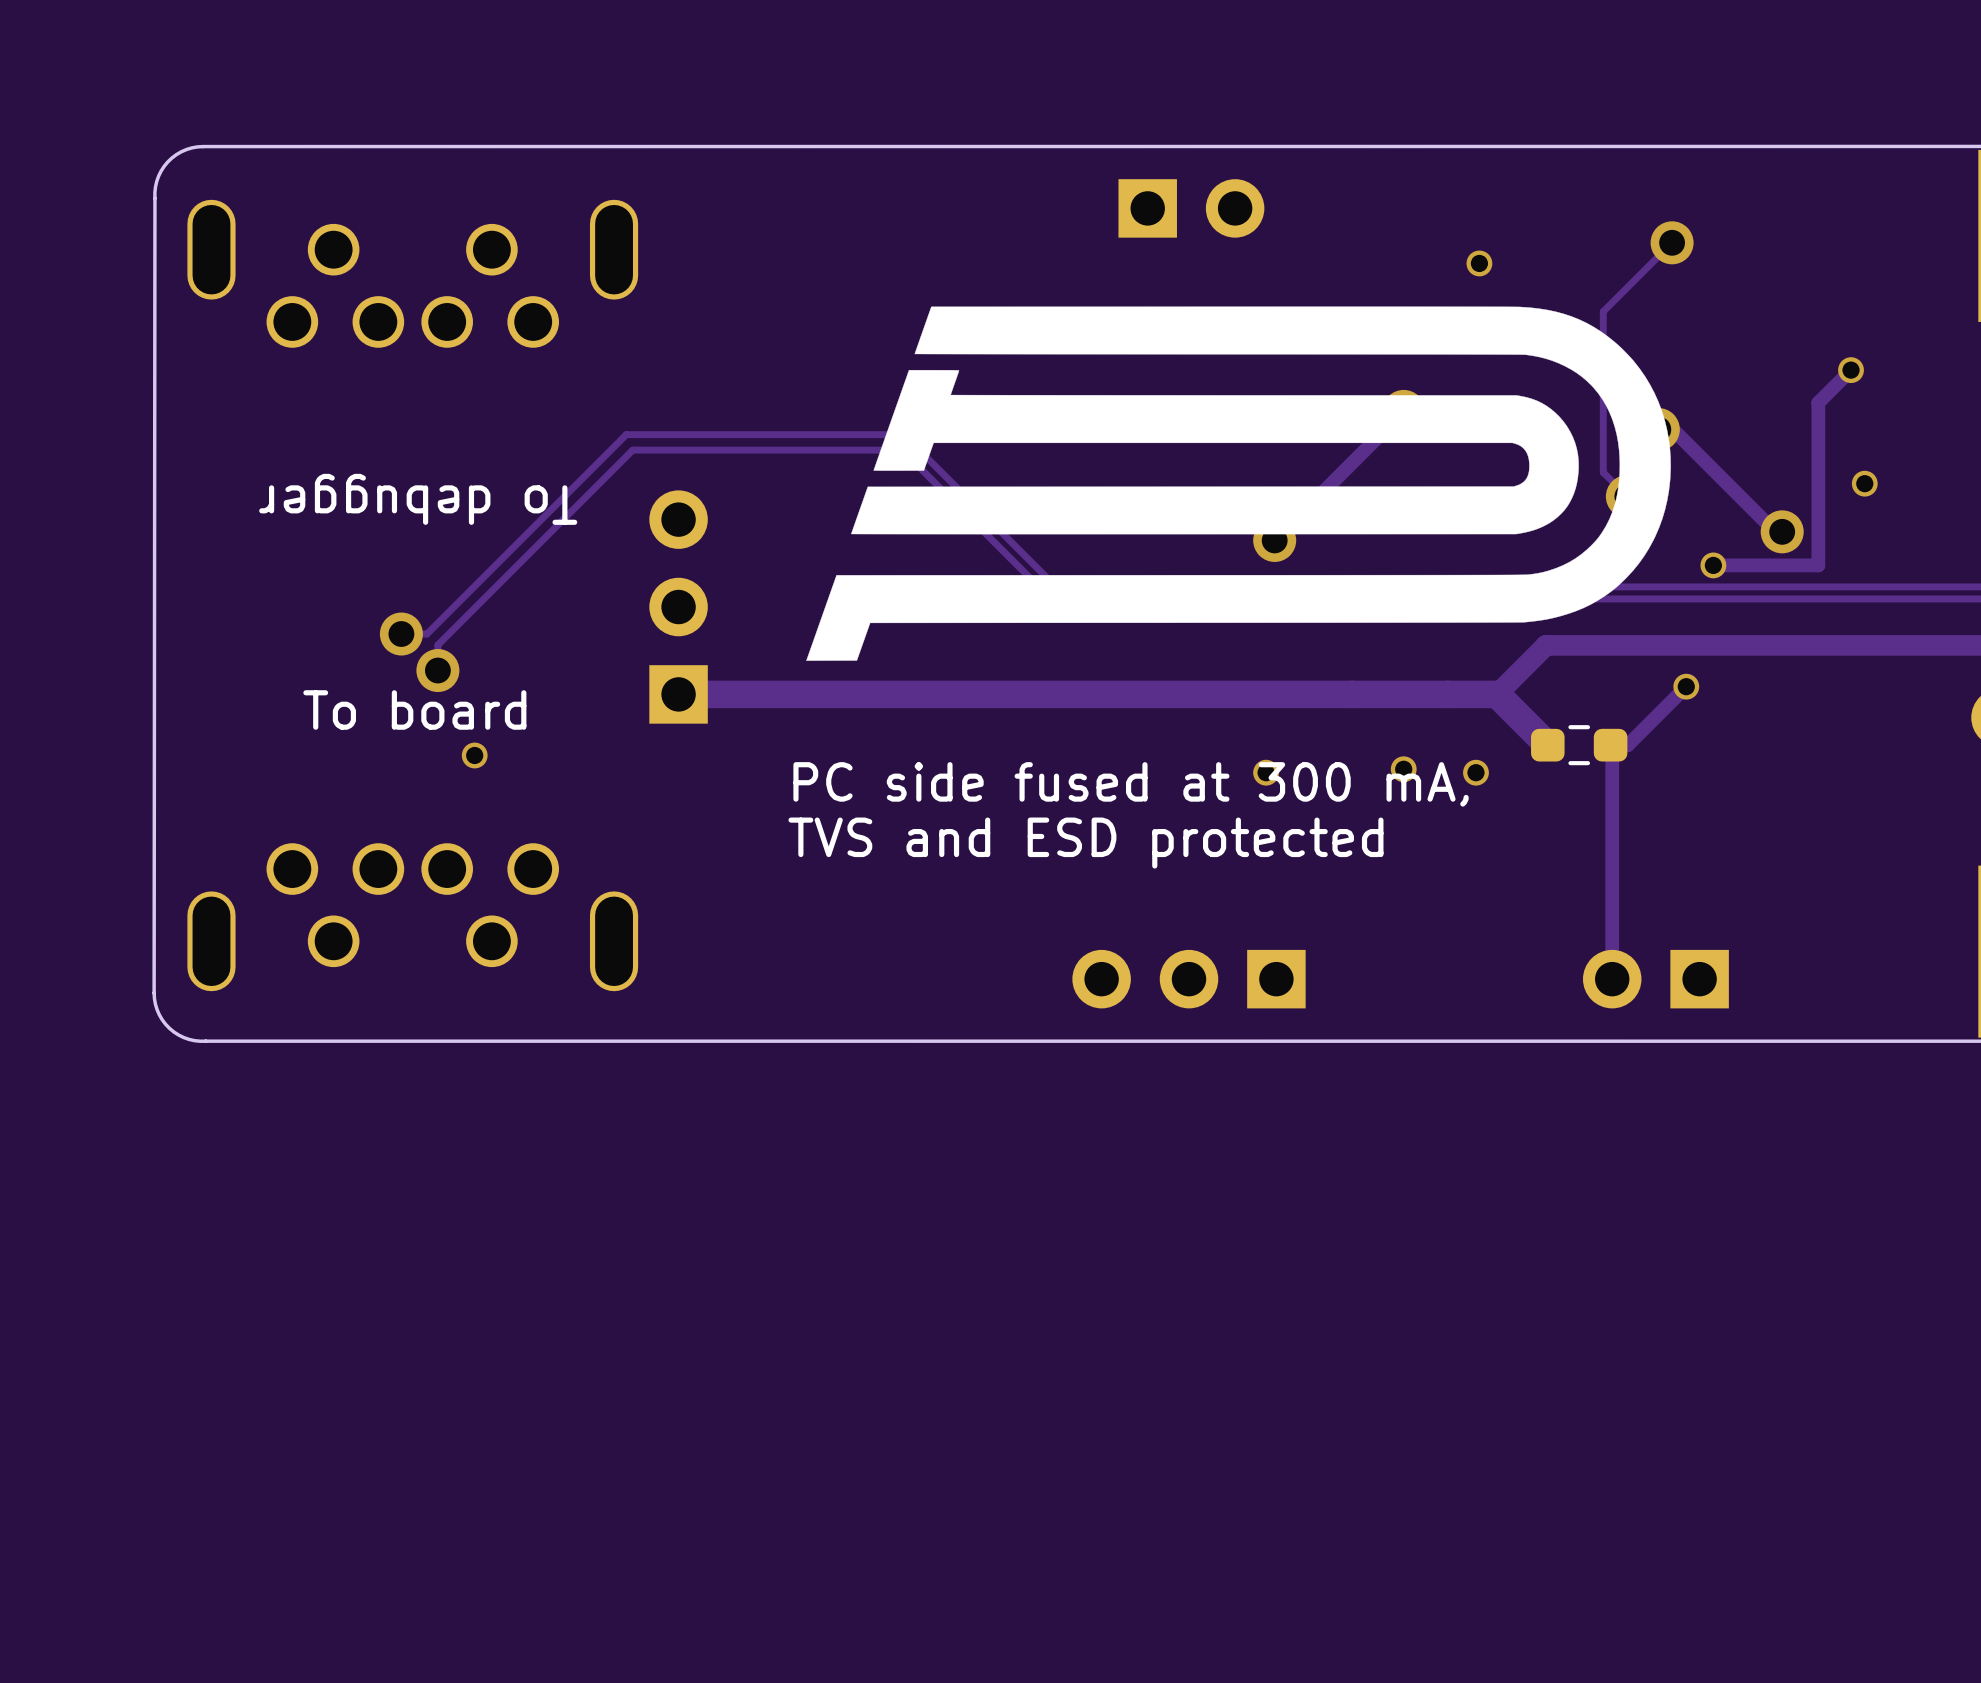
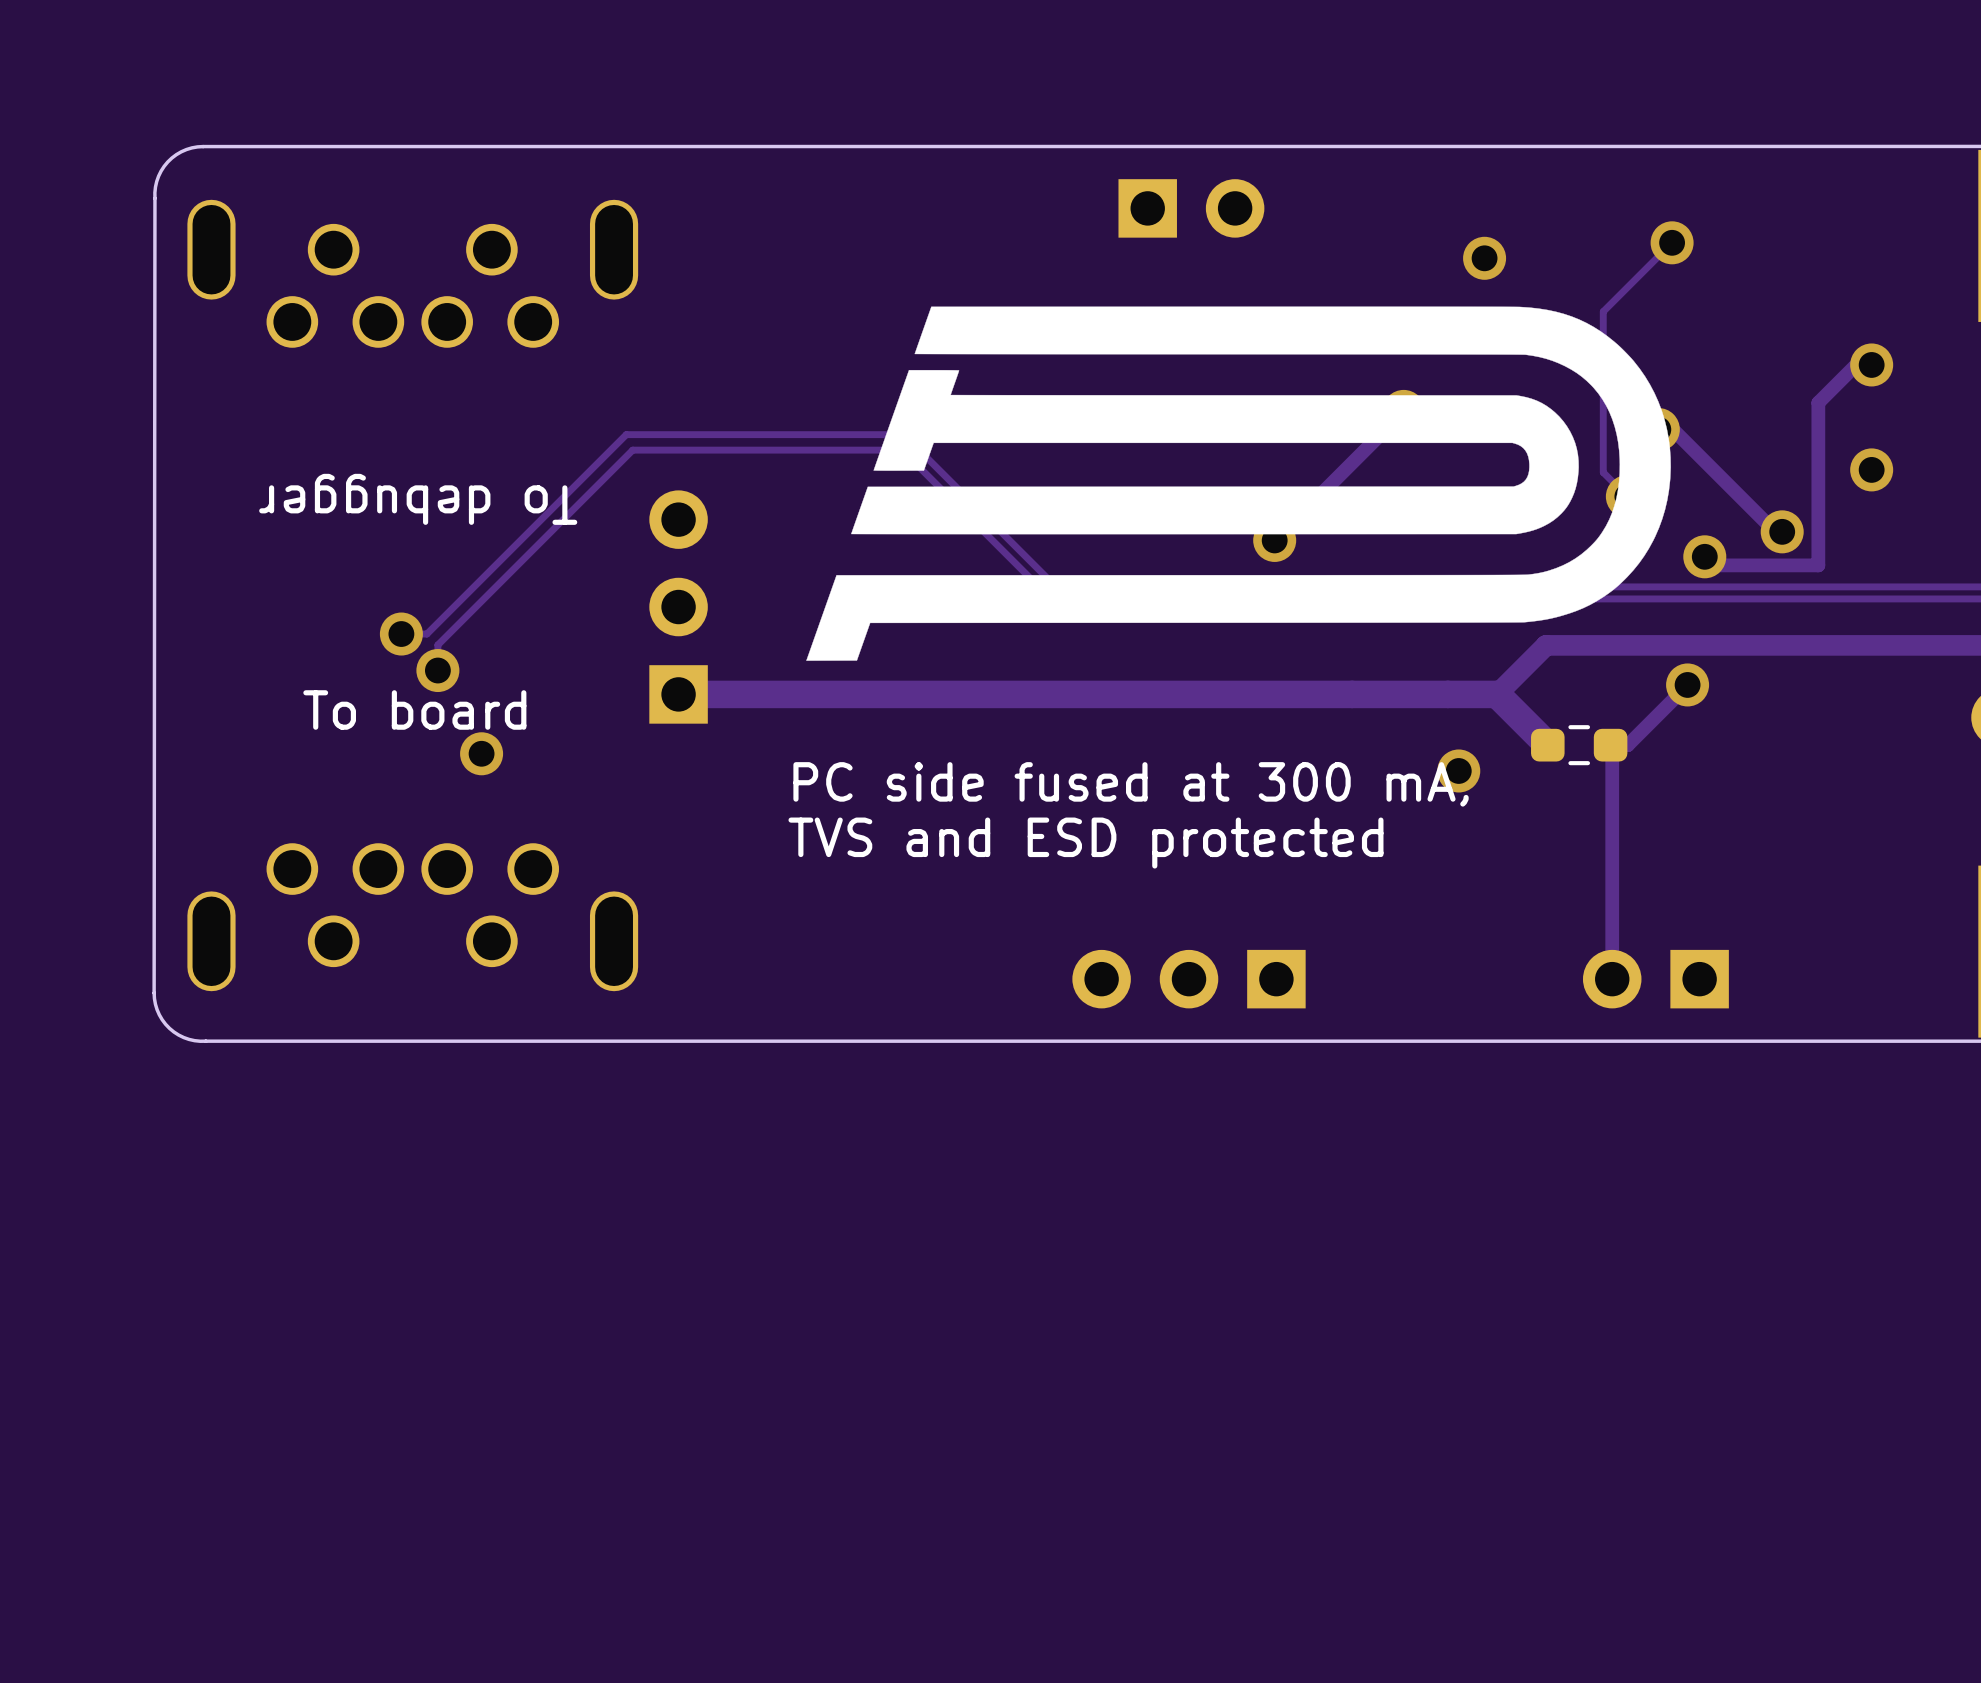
via size: [1466, 250, 1493, 277] -> [1463, 236, 1507, 280]
via size: [1838, 357, 1864, 384] -> [1850, 343, 1894, 387]
via size: [1851, 470, 1878, 497] -> [1850, 448, 1894, 492]
via size: [1700, 552, 1727, 579] -> [1683, 535, 1727, 579]
via size: [1673, 673, 1700, 700] -> [1666, 663, 1710, 707]
via size: [461, 742, 488, 769] -> [460, 732, 504, 776]
via size: [1463, 759, 1489, 786] -> [1437, 749, 1481, 793]
via: (1403, 769) -> none
via: (1266, 772) -> none

